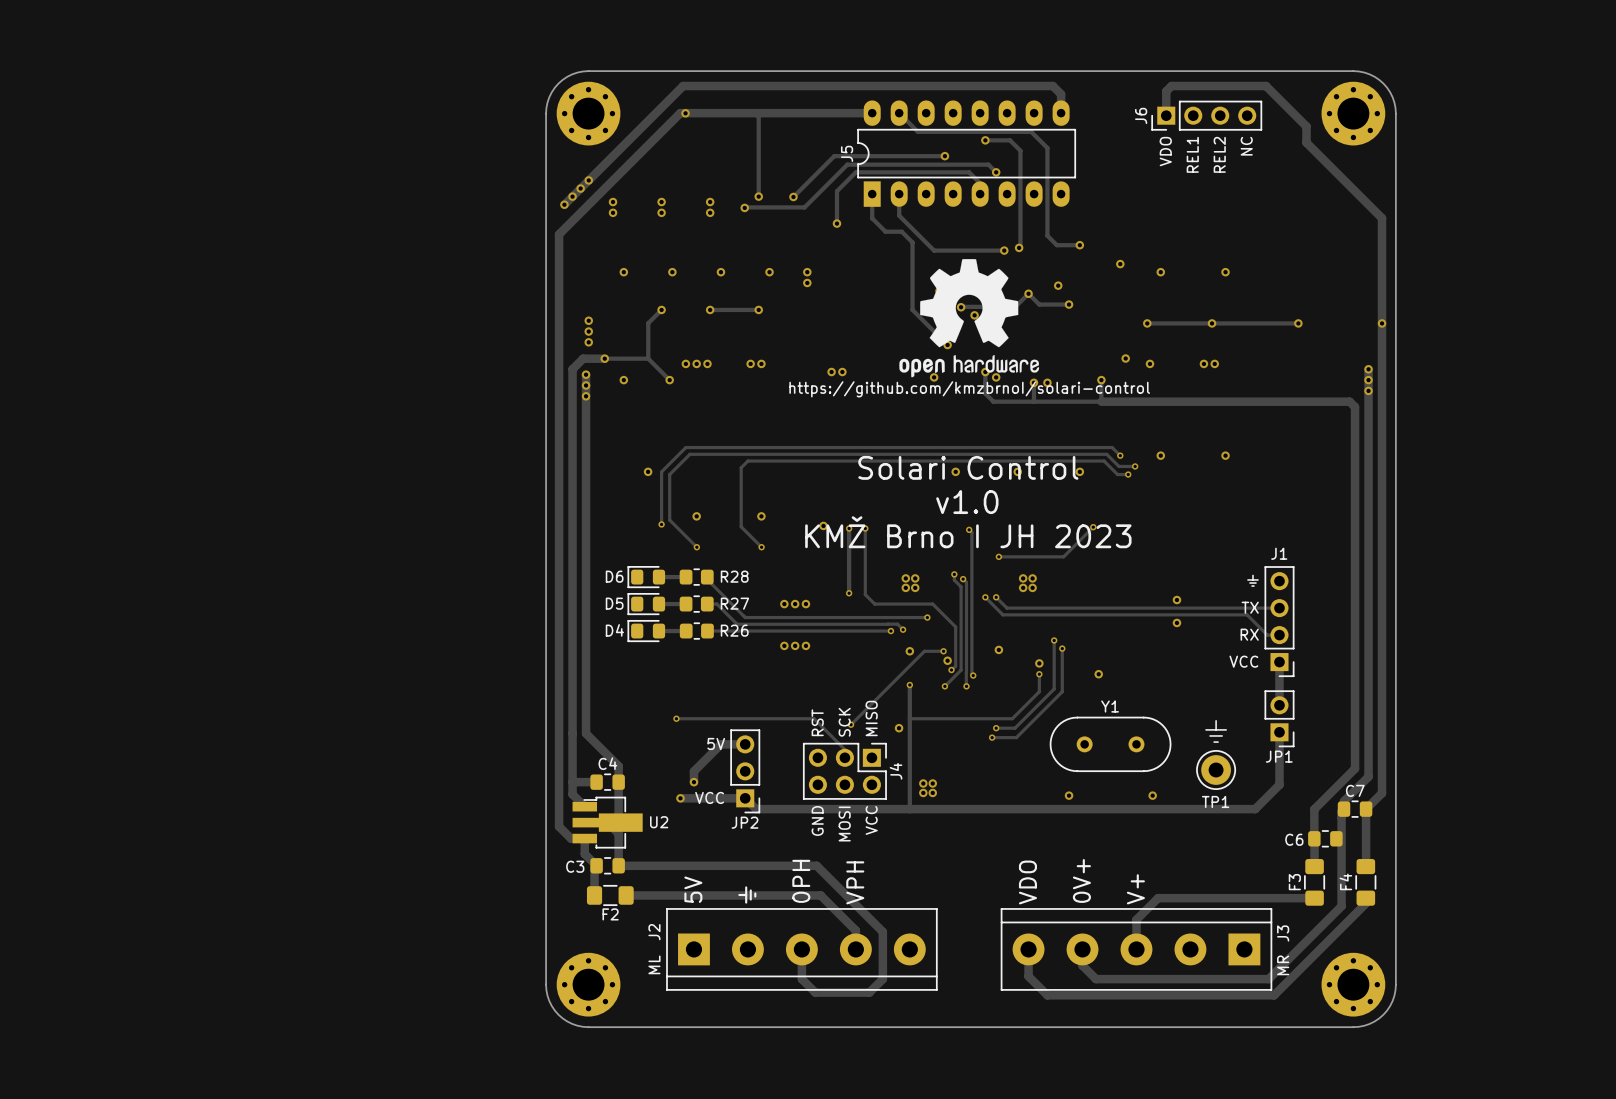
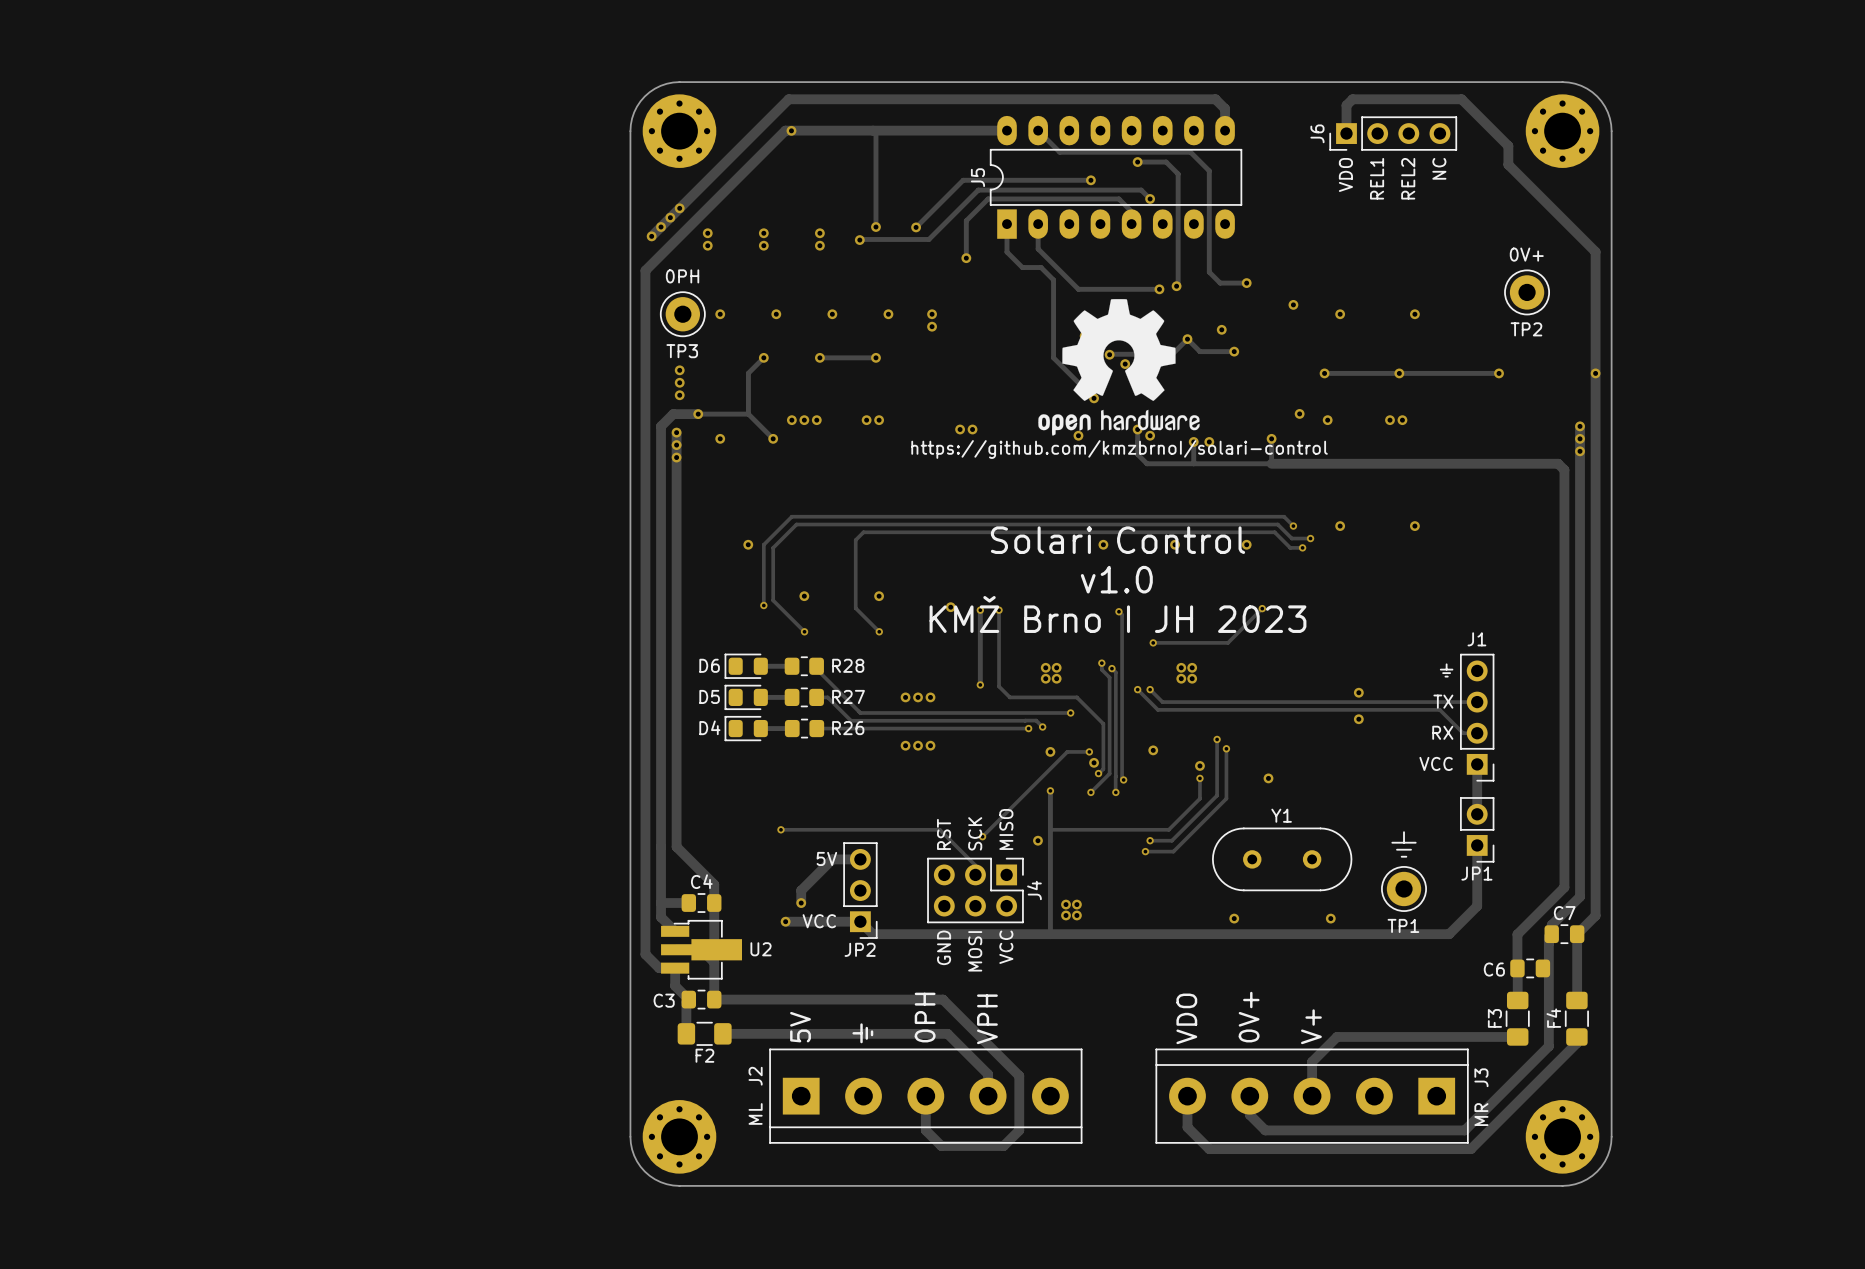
text: none -> 0V+ (1526, 254)
text: none -> 0PH (682, 276)
TP2: none -> (1527, 292)
TP3: none -> (682, 314)

